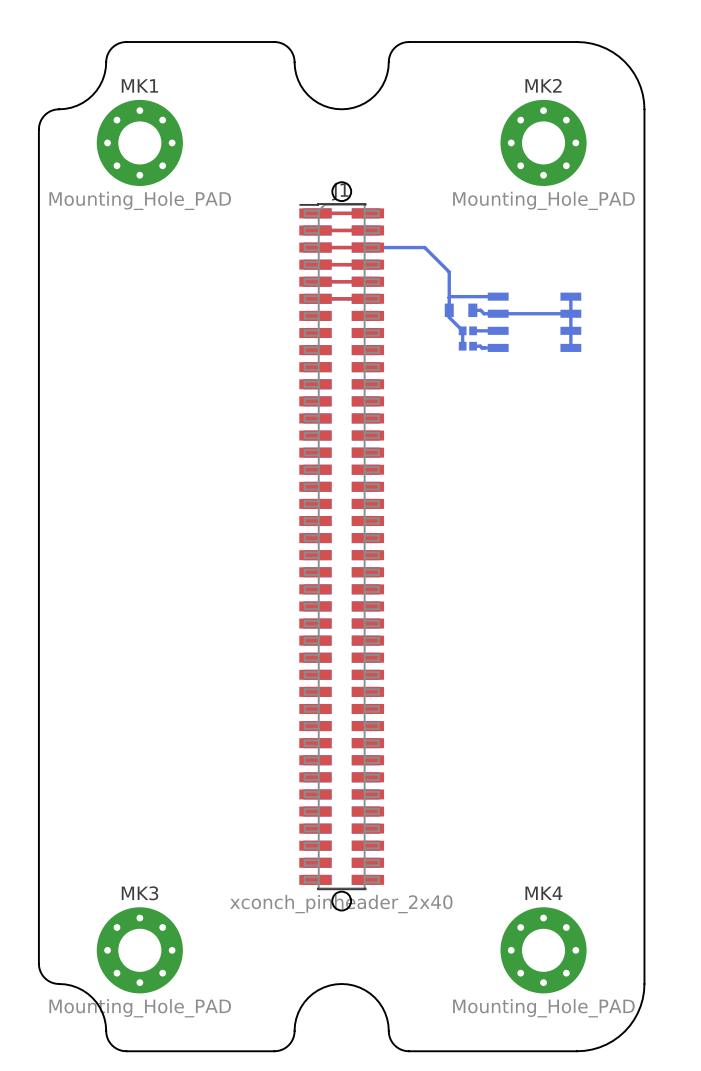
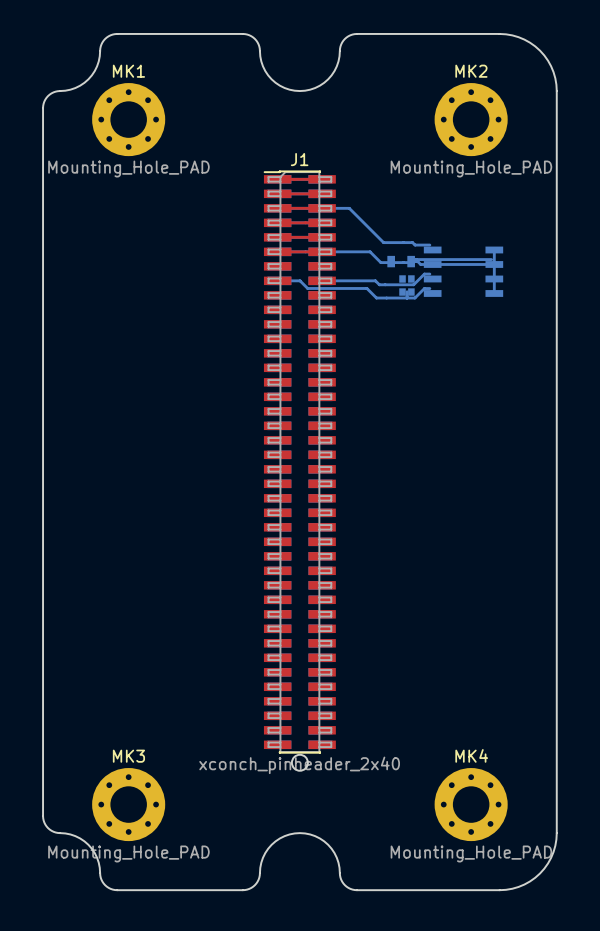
round board edge: [332, 182, 352, 202] -> none
bottom track: (399, 247) (424, 247) (449, 272) (449, 317) (462, 330) (462, 346) -> (349, 208) (383, 242) (412, 242) (415, 245) (429, 245)
bottom track: (498, 296) (449, 297) -> none
bottom track: none -> (320, 251) (370, 251) (380, 262) (413, 262) (416, 259) (491, 259)
bottom track: none -> (429, 274) (424, 274) (413, 284) (379, 284) (375, 280) (320, 280)
bottom track: (473, 330) (498, 330) -> none
bottom track: none -> (279, 280) (300, 280) (307, 288) (366, 288) (376, 298) (414, 298) (424, 288) (429, 288)
bottom track: none -> (407, 291) (407, 297)
bottom track: (473, 346) (498, 347) -> none

